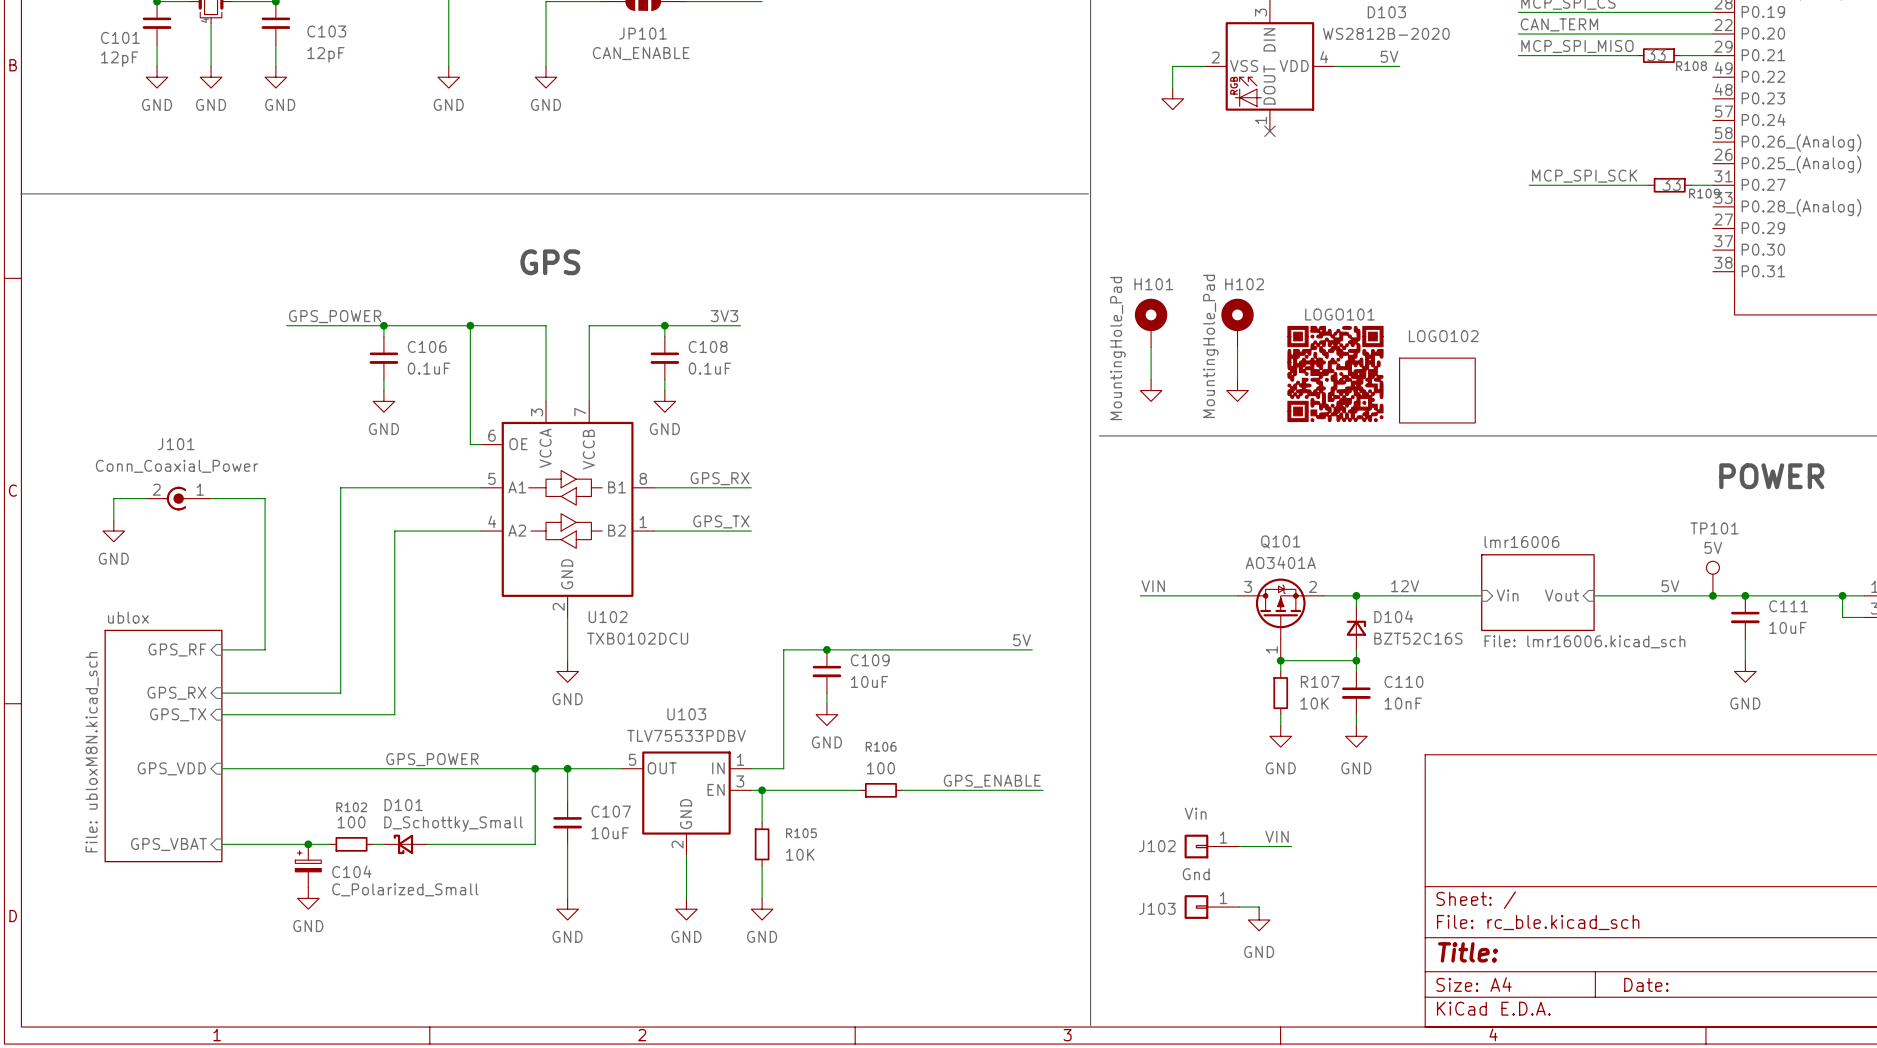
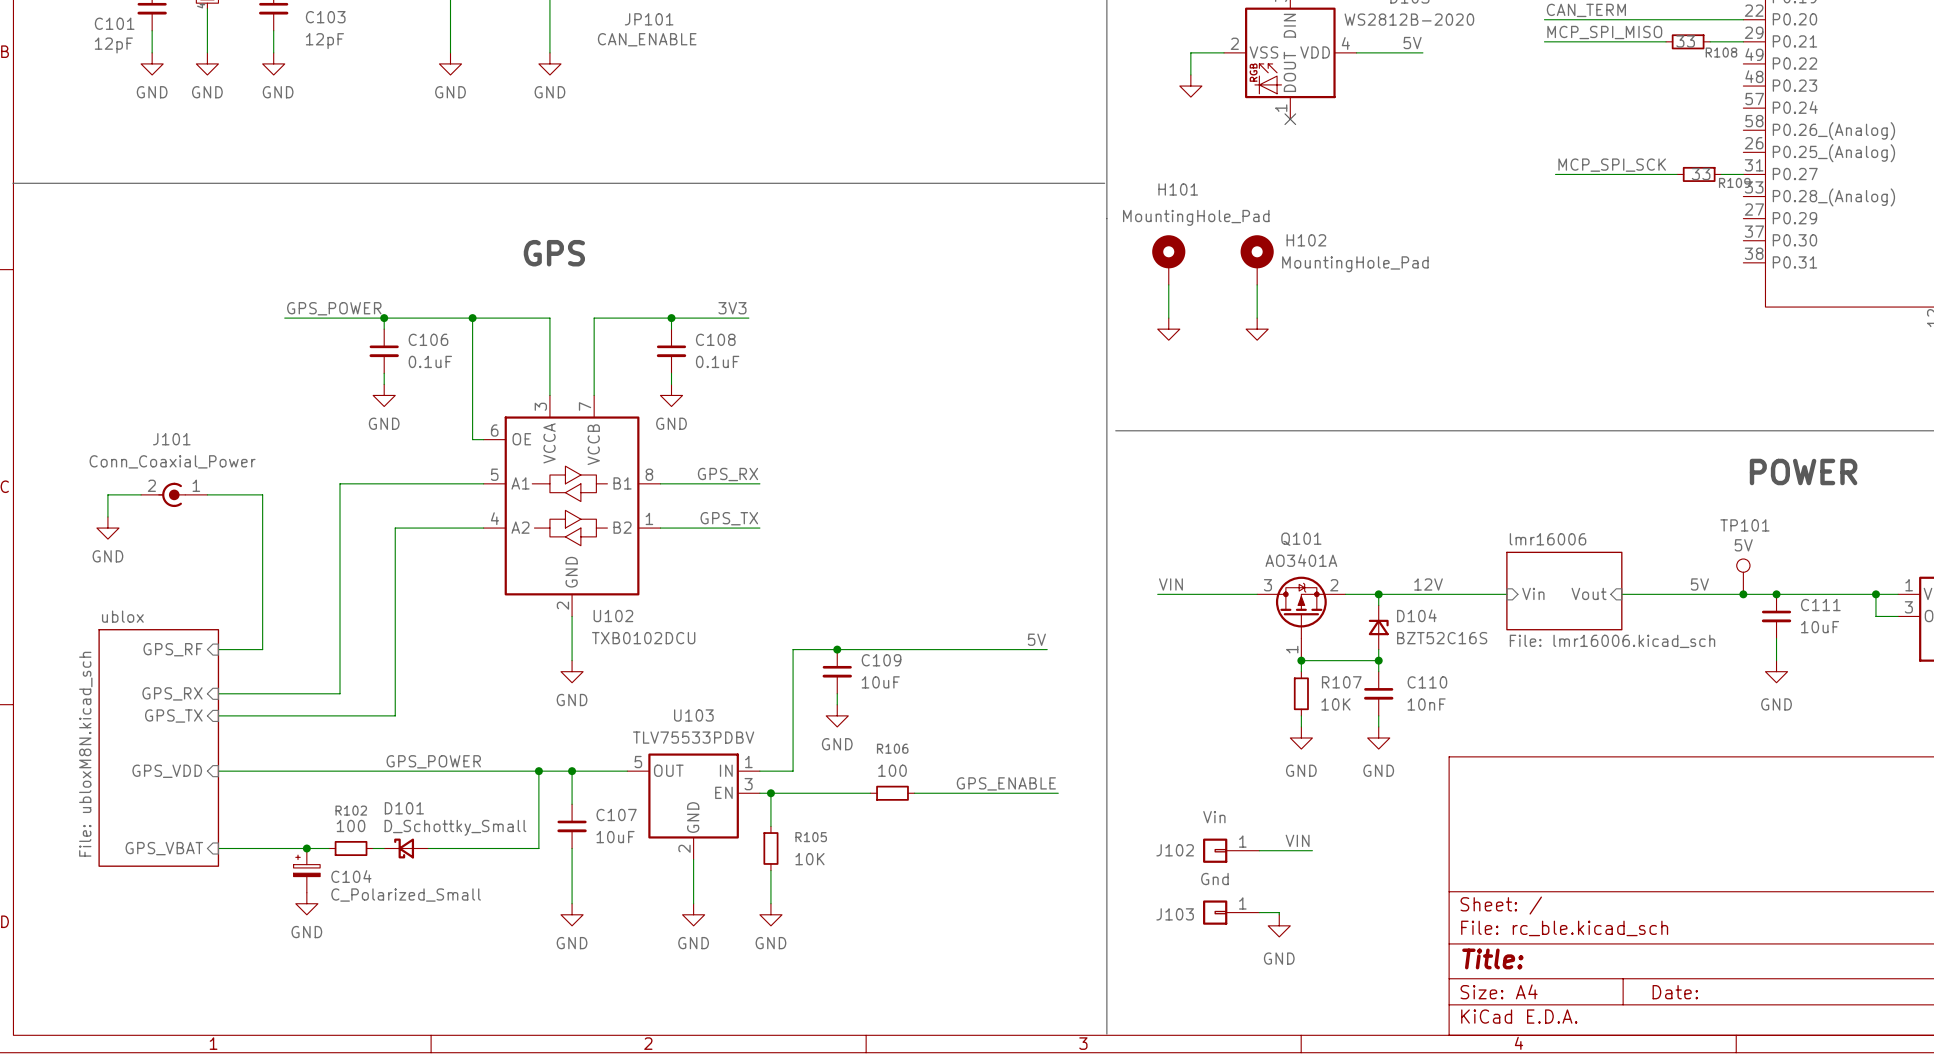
H101 name position: H101 (1153, 284) -> H101 (1178, 189)
H102 name position: H102 (1244, 284) -> H102 (1306, 240)
H101 position: (1151, 323) -> (1168, 260)
H102 position: (1237, 323) -> (1257, 260)
power symbol: none -> (1168, 329)
power symbol: none -> (1257, 329)
H102 value rotation: 0° (1210, 346) -> 90° clockwise (1355, 264)
wire: (1151, 347) (1151, 379) -> (1168, 284) (1168, 318)
wire: (1237, 347) (1237, 379) -> (1257, 284) (1257, 318)
H101 value rotation: 0° (1117, 348) -> 90° clockwise (1196, 217)
LOGO101: (1335, 373) -> none
power symbol: (1151, 390) -> none
power symbol: (1237, 390) -> none
LOGO102: (1437, 390) -> none

